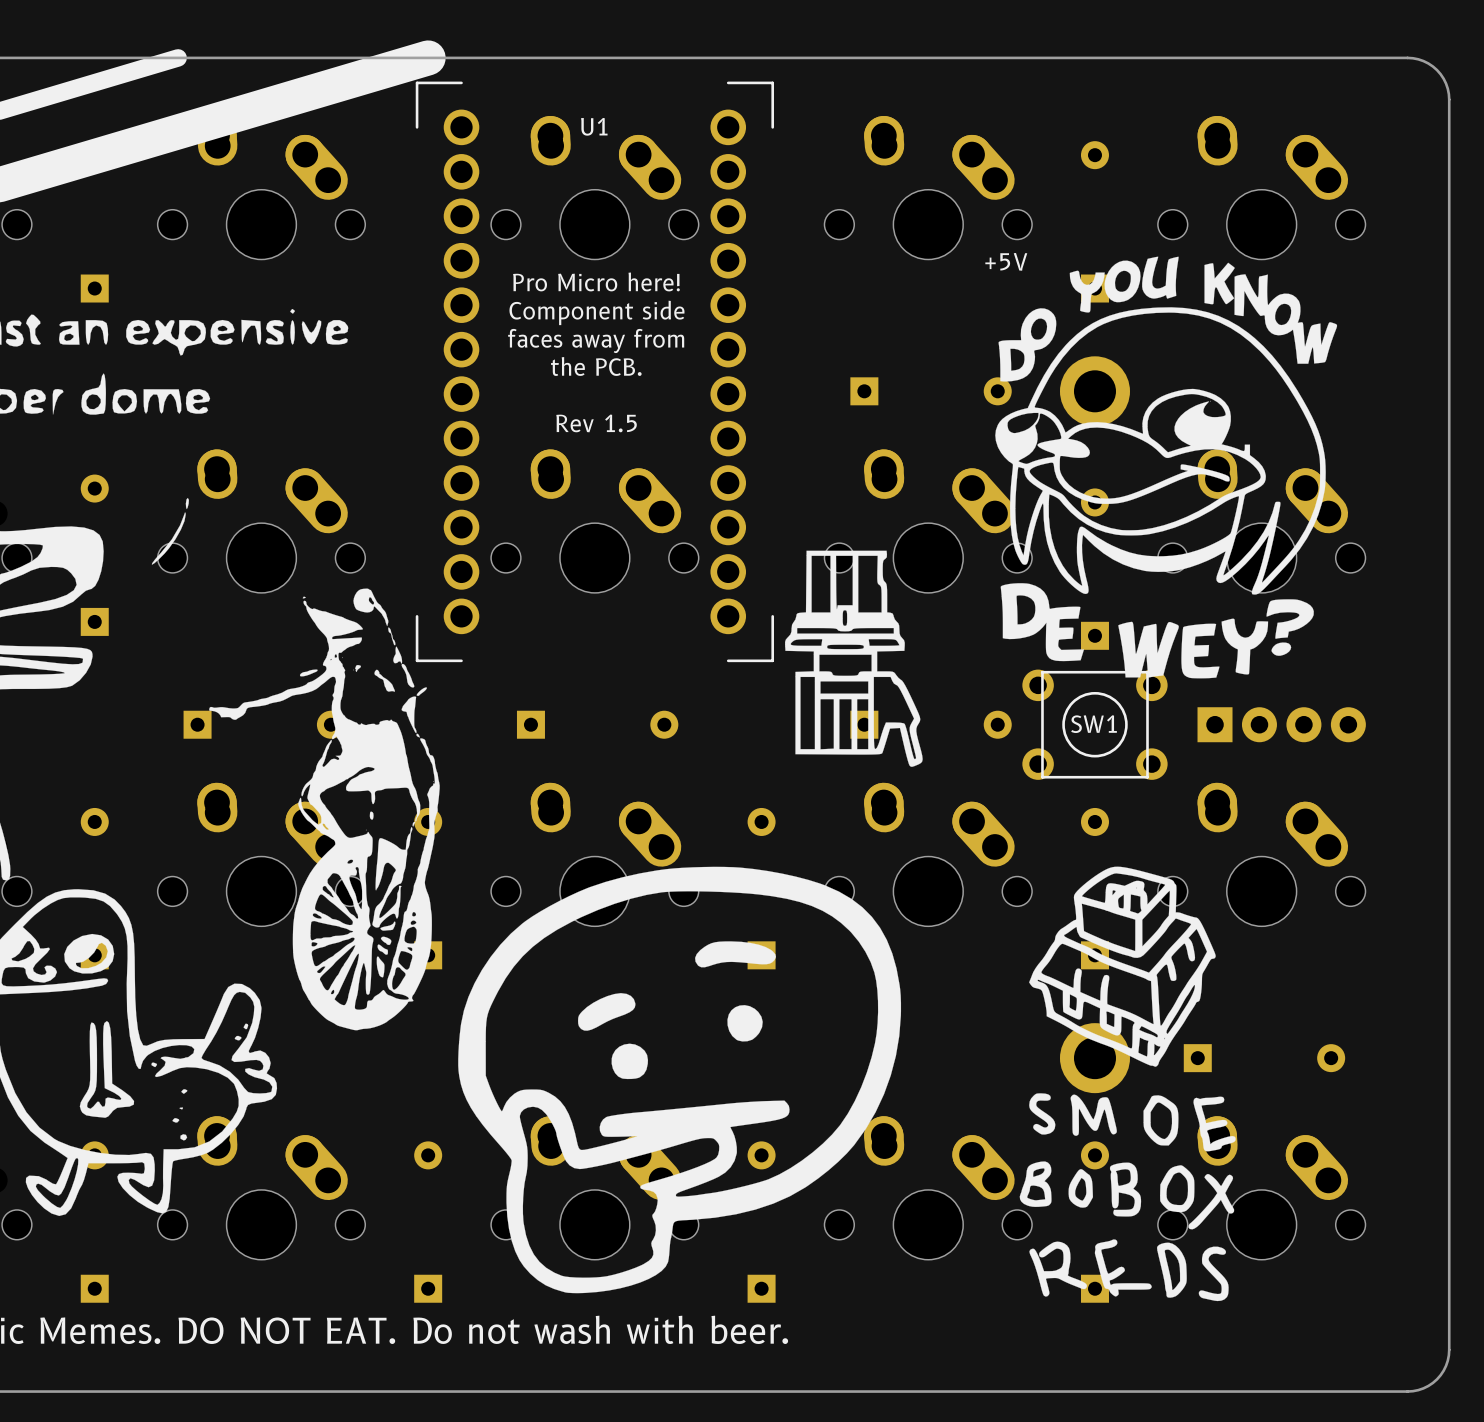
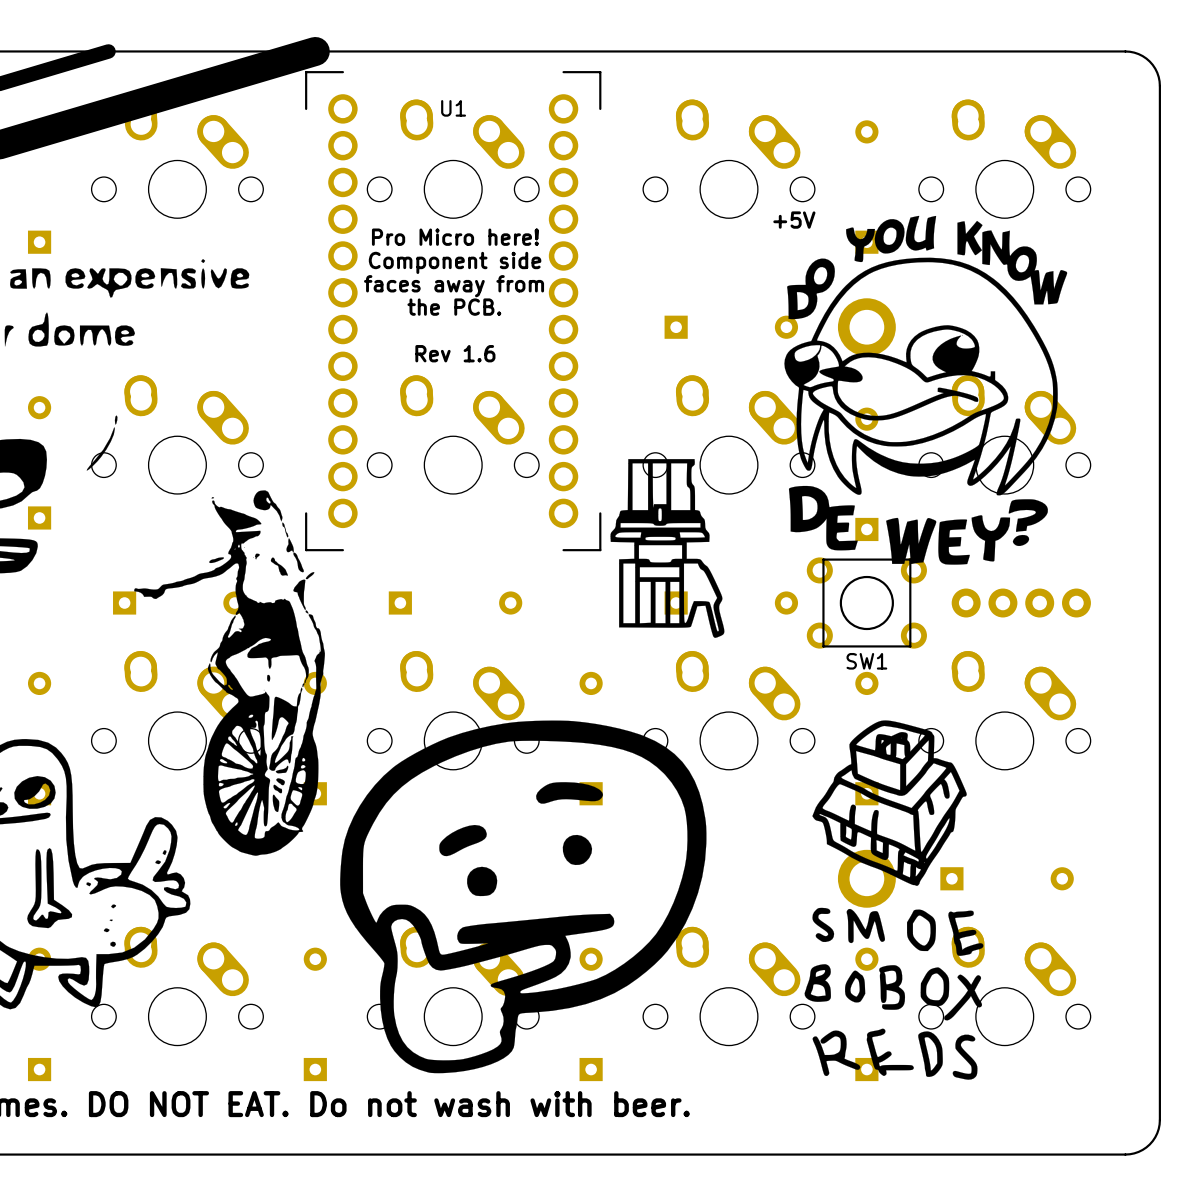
text: Rev 1.5 (596, 423) -> Rev 1.6 (455, 353)
part footprint: [1197, 707, 1233, 743] -> [951, 588, 981, 618]
SW1 name position: SW1 (1094, 724) -> SW1 (866, 661)

